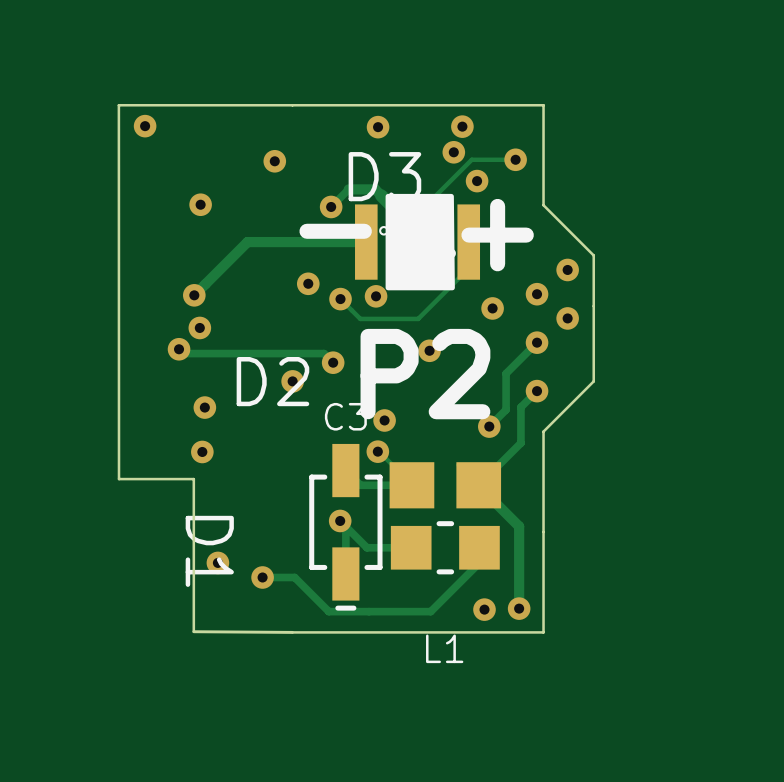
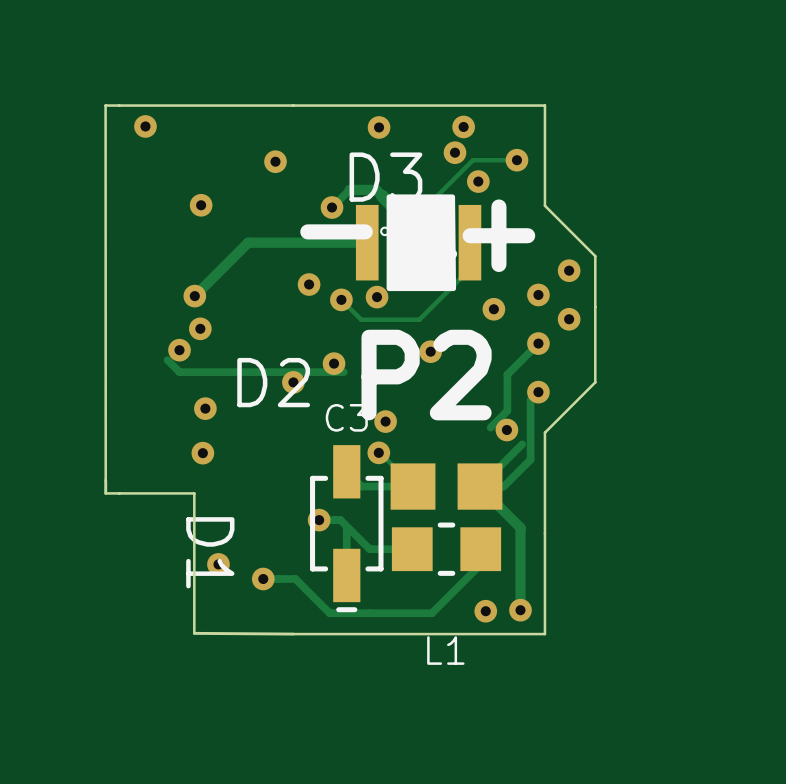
board edge: (118, 105) (119, 479) (193, 479) (193, 492) -> (119, 105) (105, 105) (105, 493) (194, 493)
track: (179, 349) (183, 353) (324, 353) (333, 362) -> none
track: none -> (167, 360) (179, 372) (343, 372)
track: (529, 398) (520, 407) (520, 443) (499, 465) -> (530, 400) (530, 459) (503, 486) (479, 486)
via position: (489, 426) -> (506, 430)
track: (340, 520) (368, 547) -> (319, 520) (340, 520) (369, 549)
via position: (340, 520) -> (319, 520)

